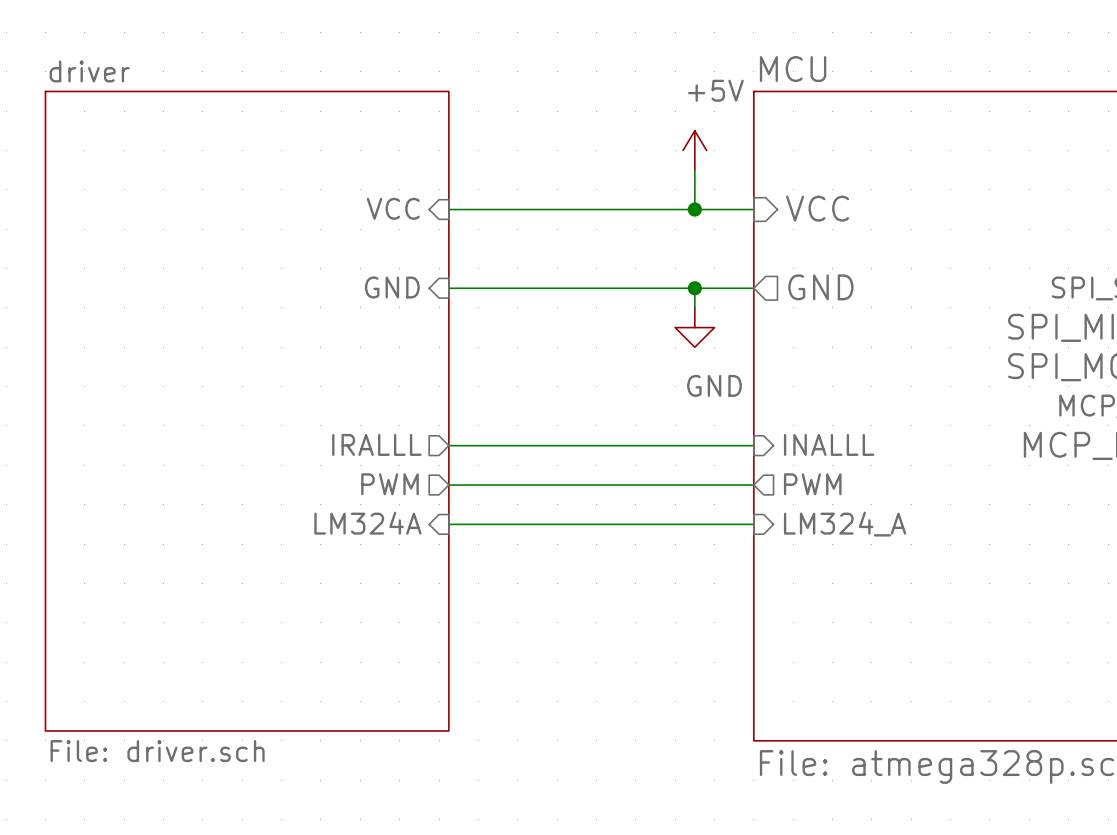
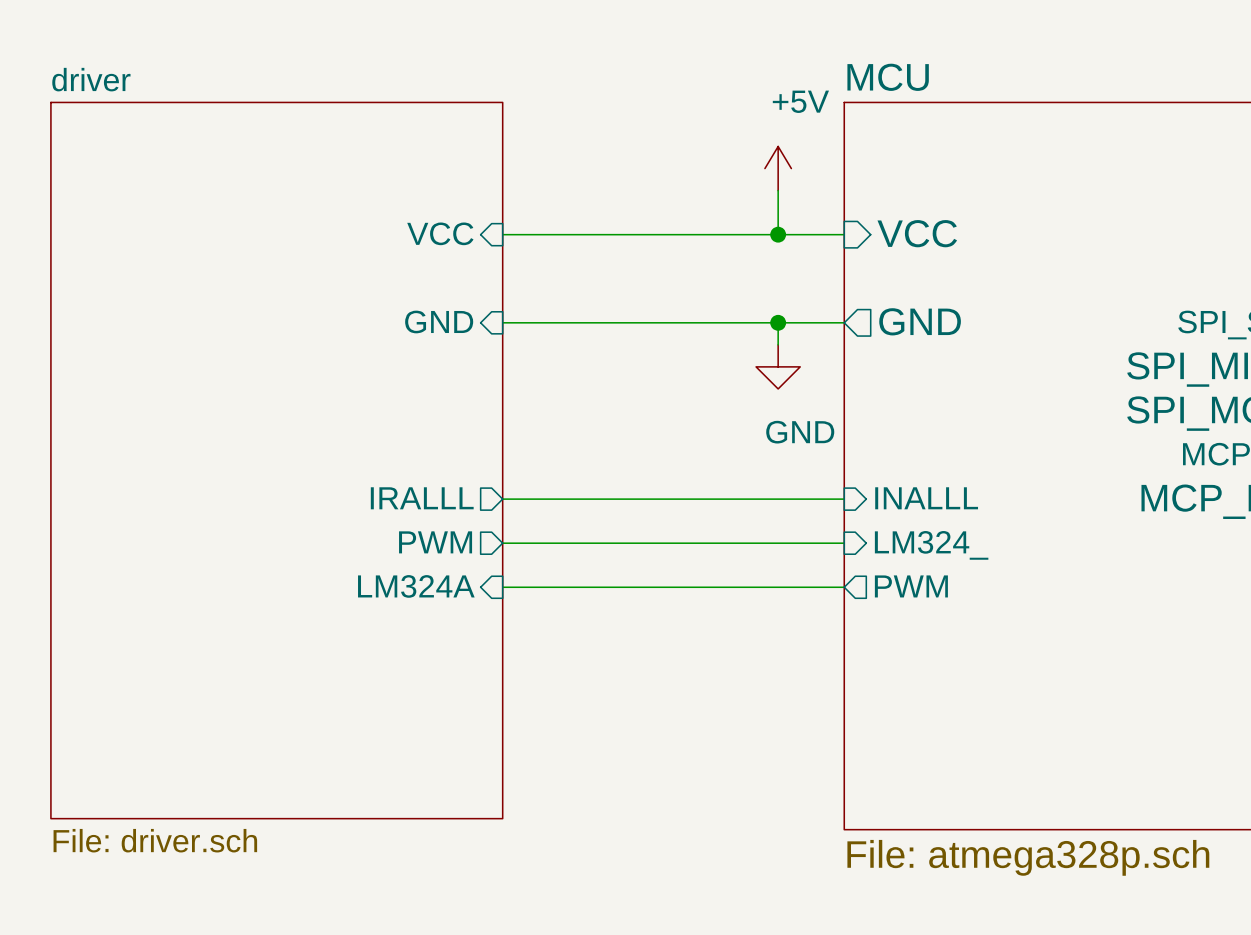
sheet pin shape: output (812, 484) -> input (931, 545)
sheet pin: PWM (812, 484) -> LM324_ (931, 545)
sheet pin shape: input (845, 524) -> output (911, 586)
sheet pin: LM324_A (845, 524) -> PWM (911, 586)

